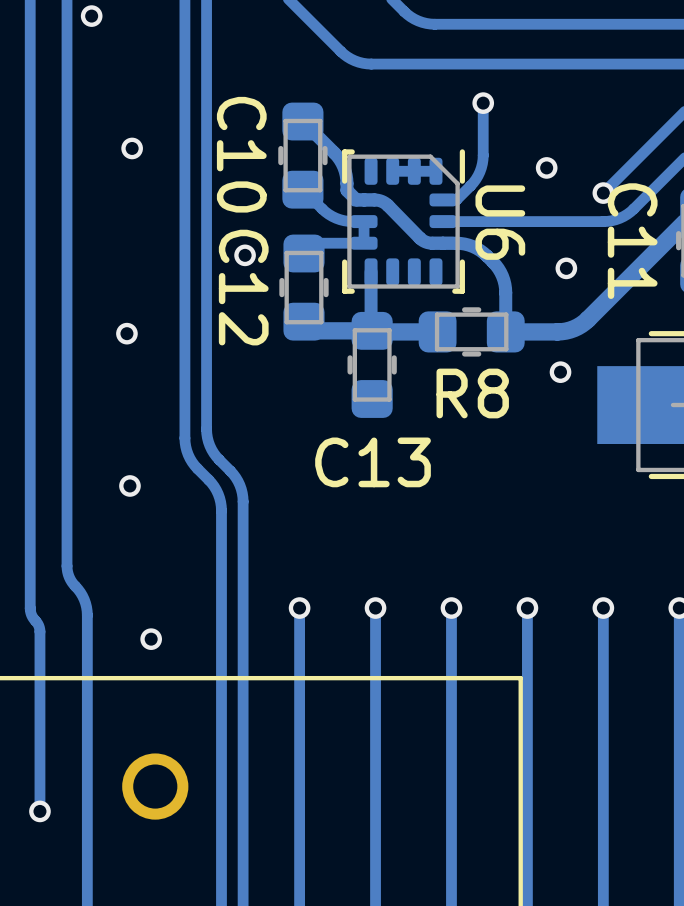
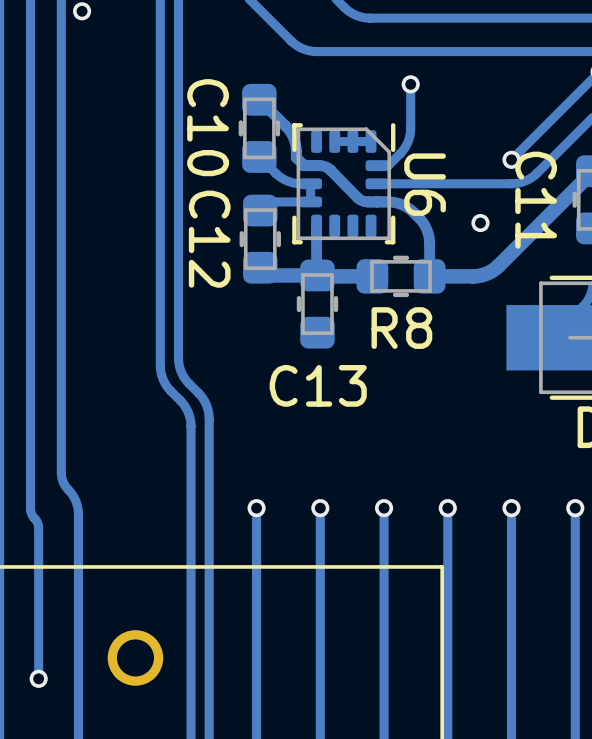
via: (132, 148) -> none
via: (546, 167) -> none
via: (245, 255) -> none
via: (126, 333) -> none
via: (560, 372) -> none
via: (129, 485) -> none
via: (151, 639) -> none

